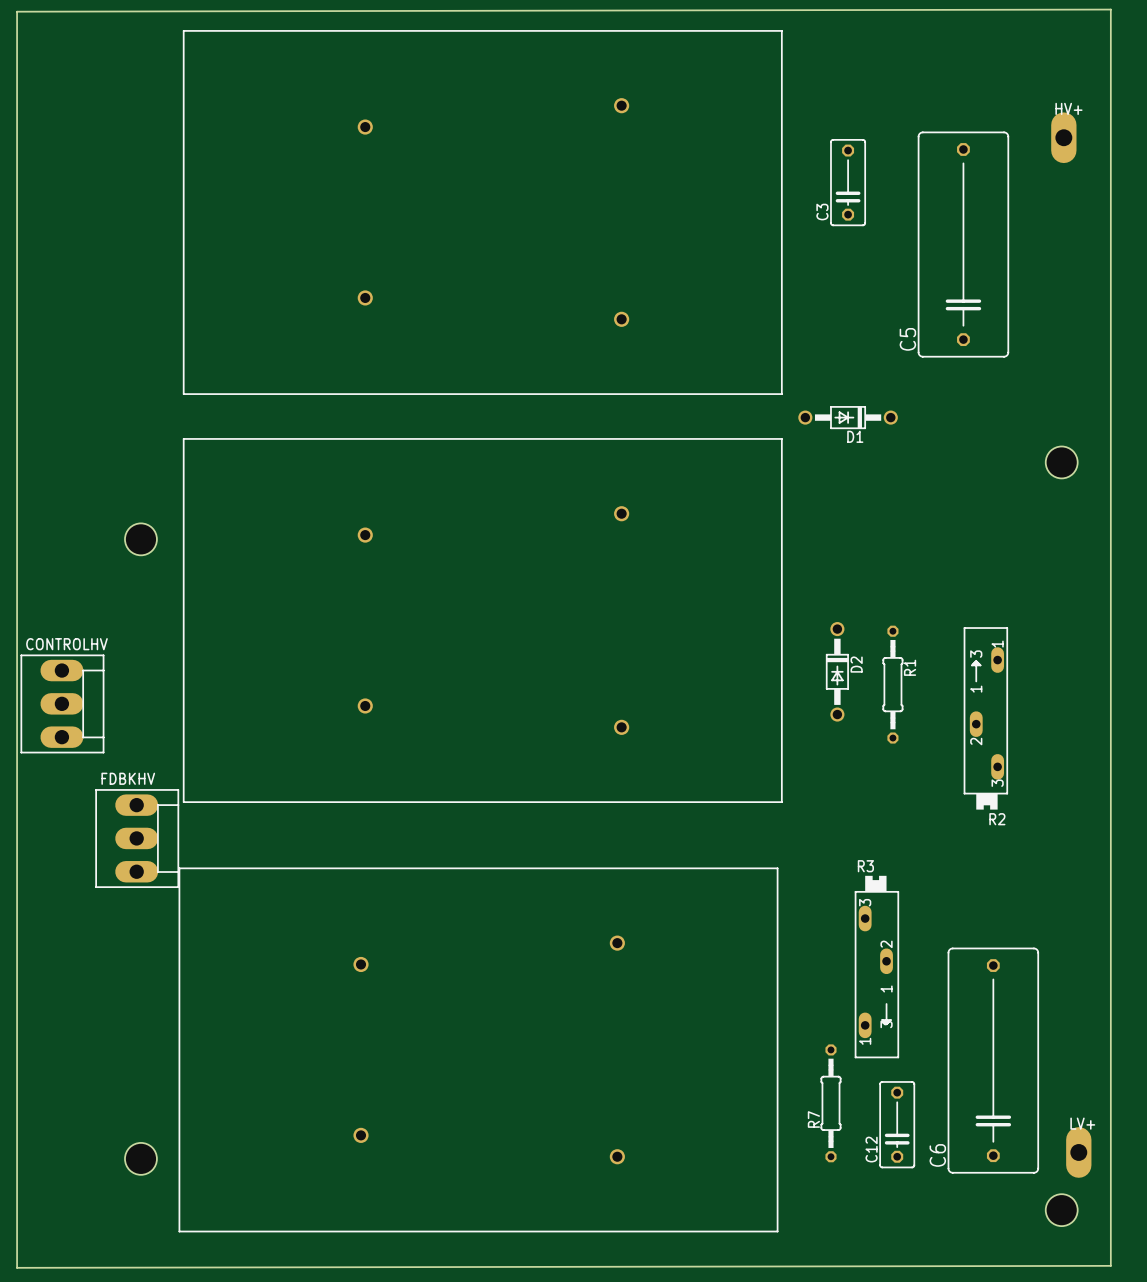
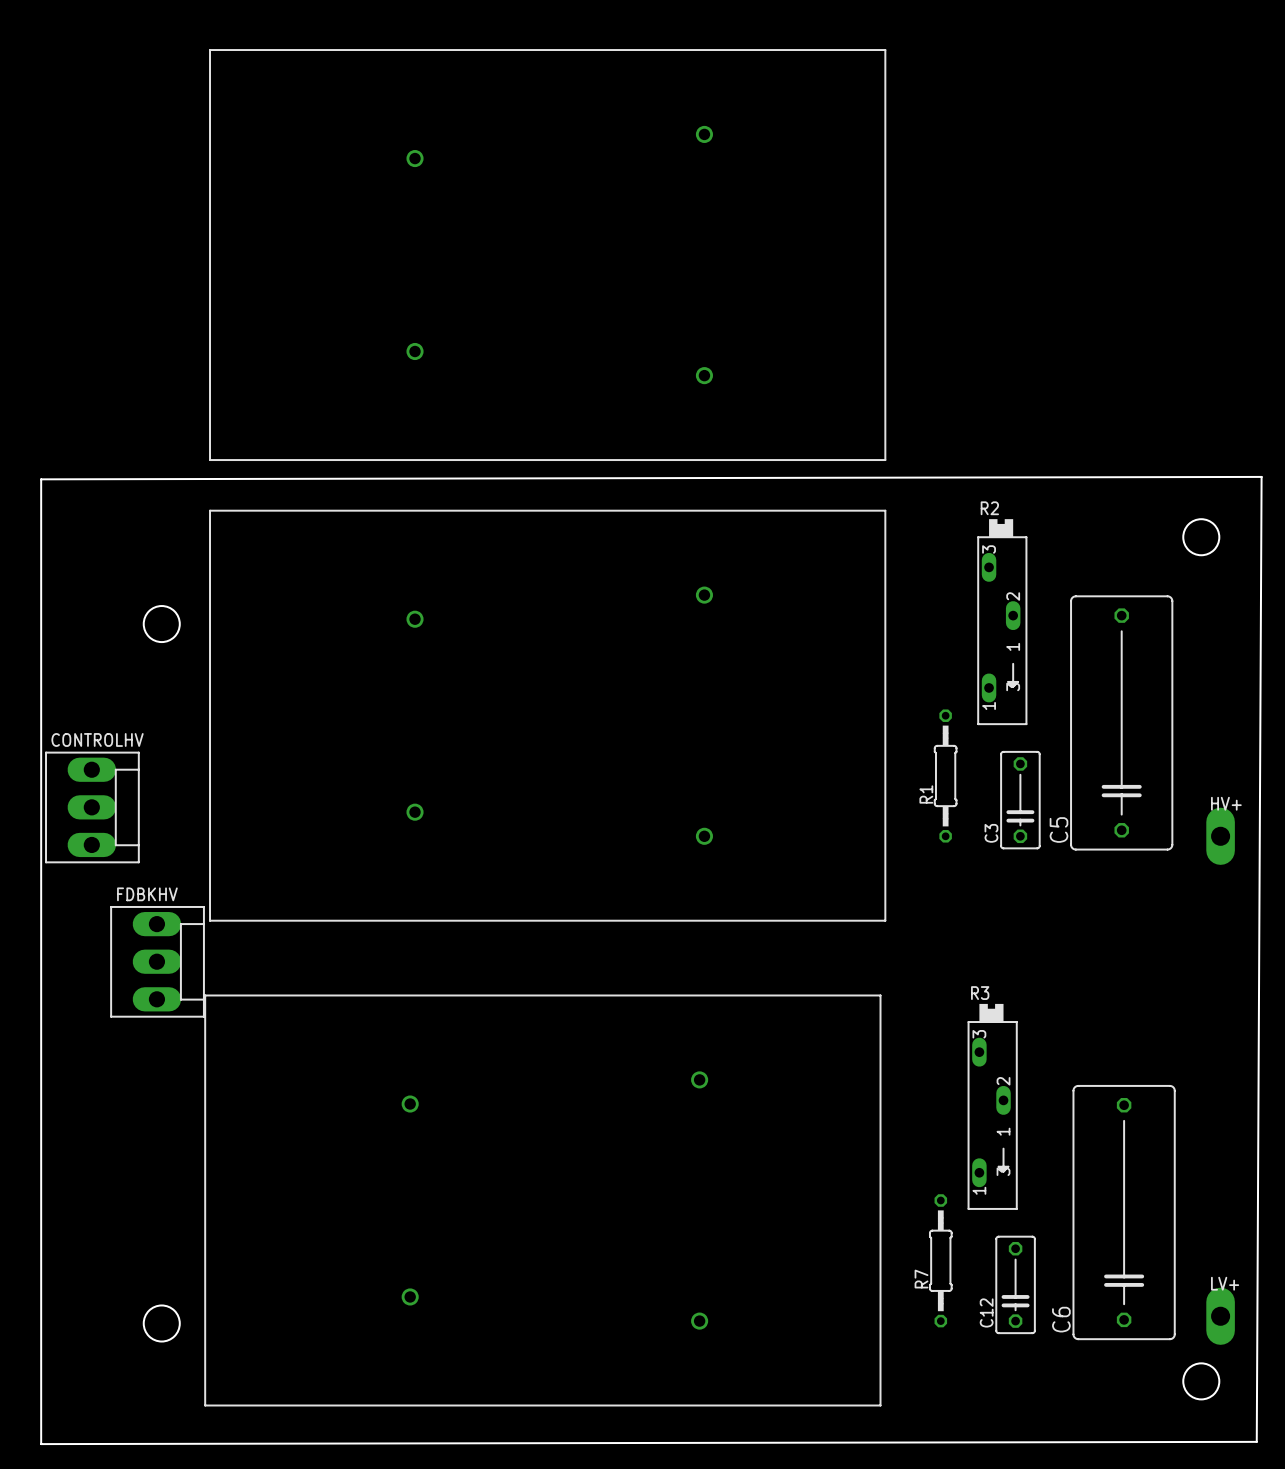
board edge: (1110, 9) (1110, 1265) (17, 1267) (17, 11) (1110, 9) -> (1261, 476) (41, 479) (41, 1444) (1256, 1441) (1261, 476)
HV+: (1063, 137) -> none
C3 position: (848, 182) -> (1020, 800)
C5 position: (963, 244) -> (1121, 722)
D1: (848, 417) -> none
R2 footprint: [963, 627, 1008, 810] -> [977, 519, 1028, 725]
R1 name position: R1 (910, 667) -> R1 (926, 794)
D2: (837, 671) -> none
R1 position: (892, 684) -> (945, 776)
CONTROLHV position: (62, 703) -> (92, 807)
HV+: none -> (1220, 836)
R2 name position: R2 (997, 819) -> R2 (989, 508)

